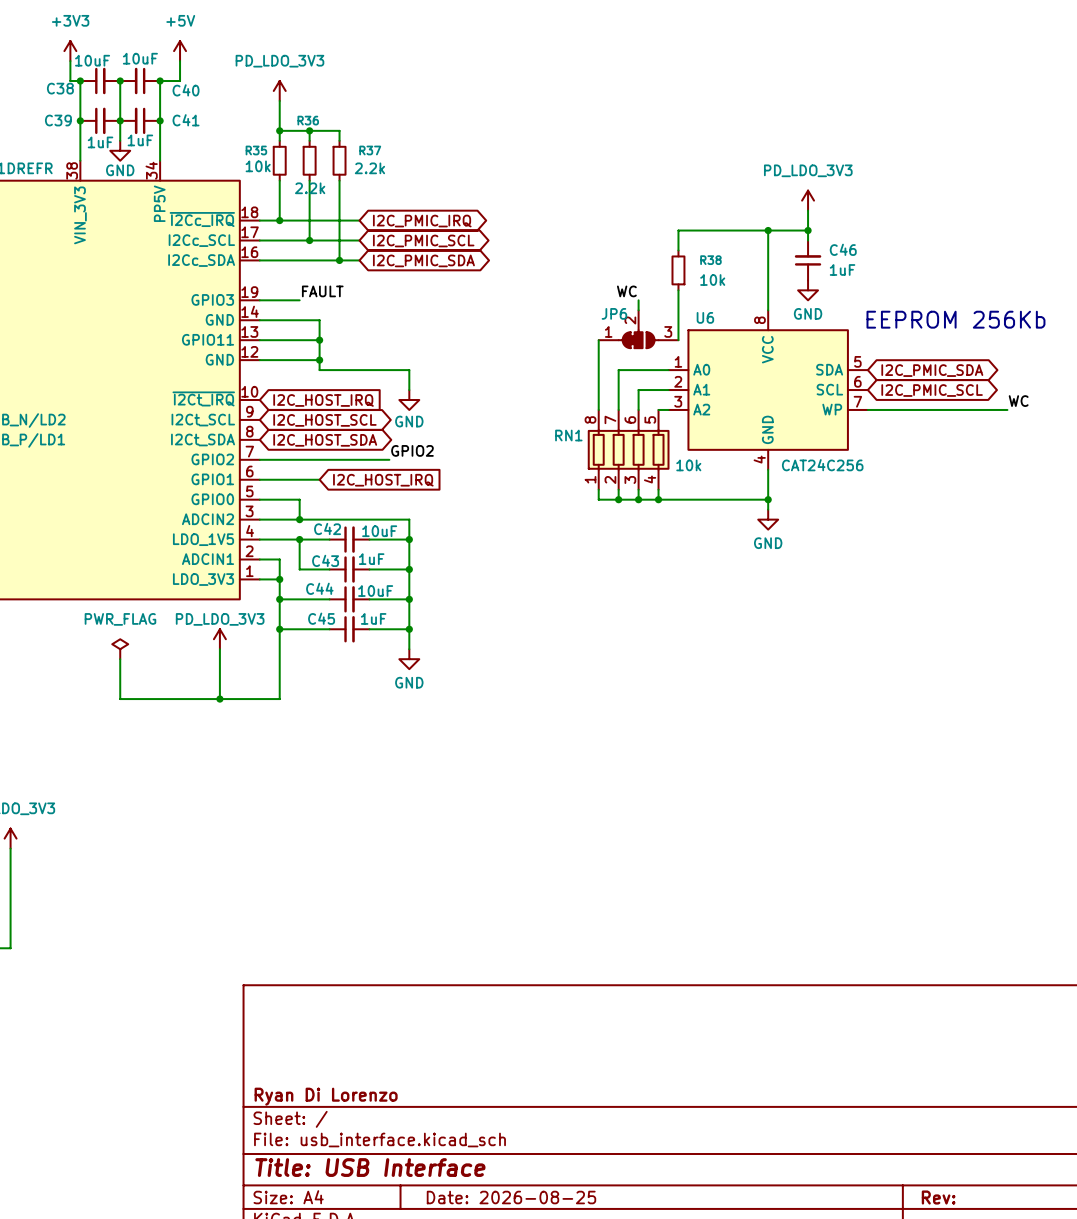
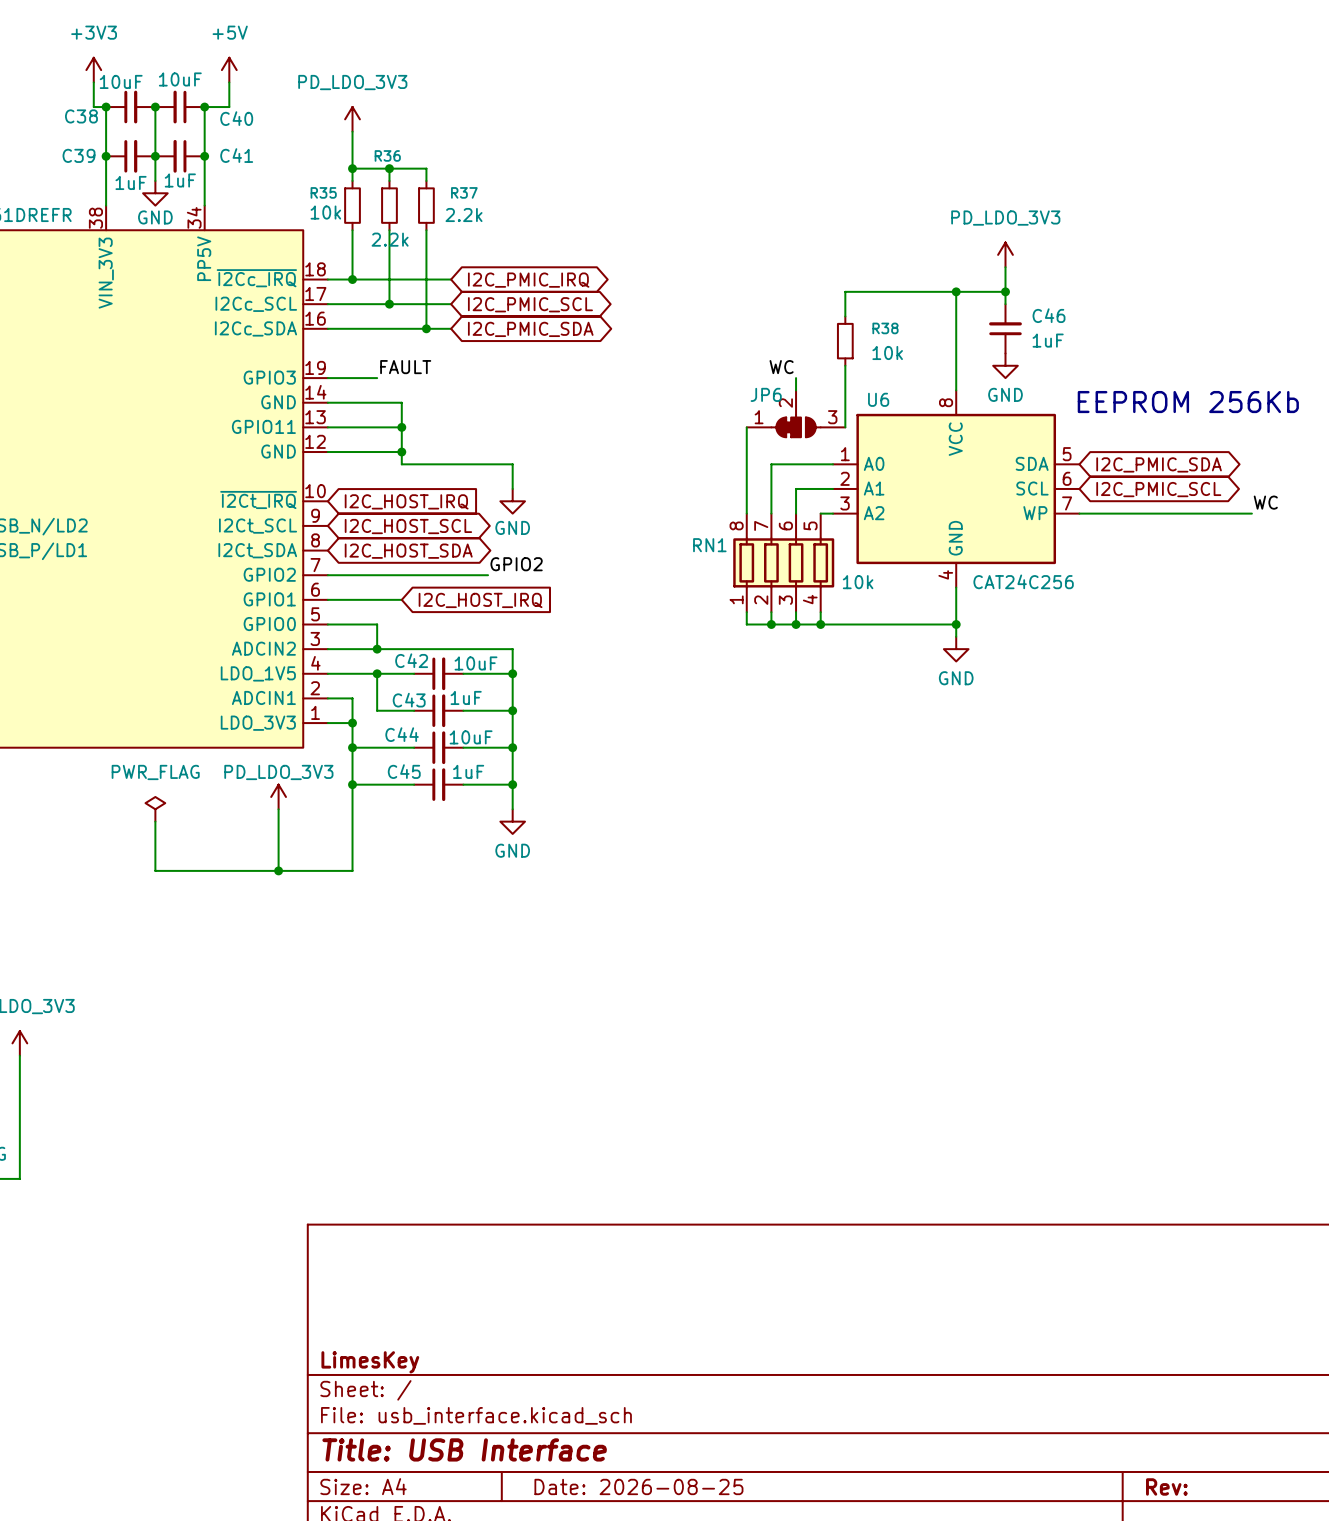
title block: Ryan Di Lorenzo (326, 1096) -> LimesKey (370, 1362)

